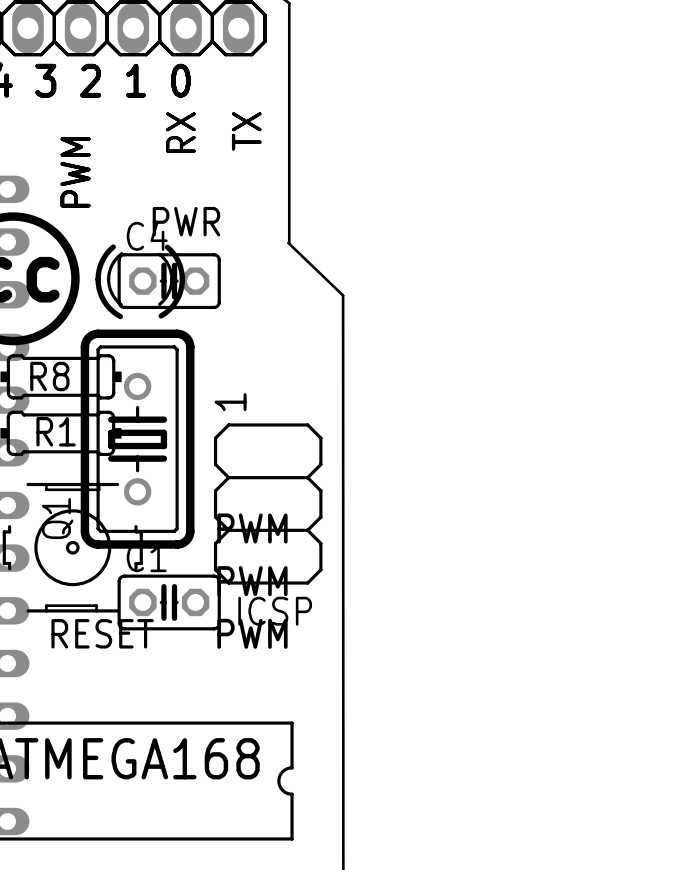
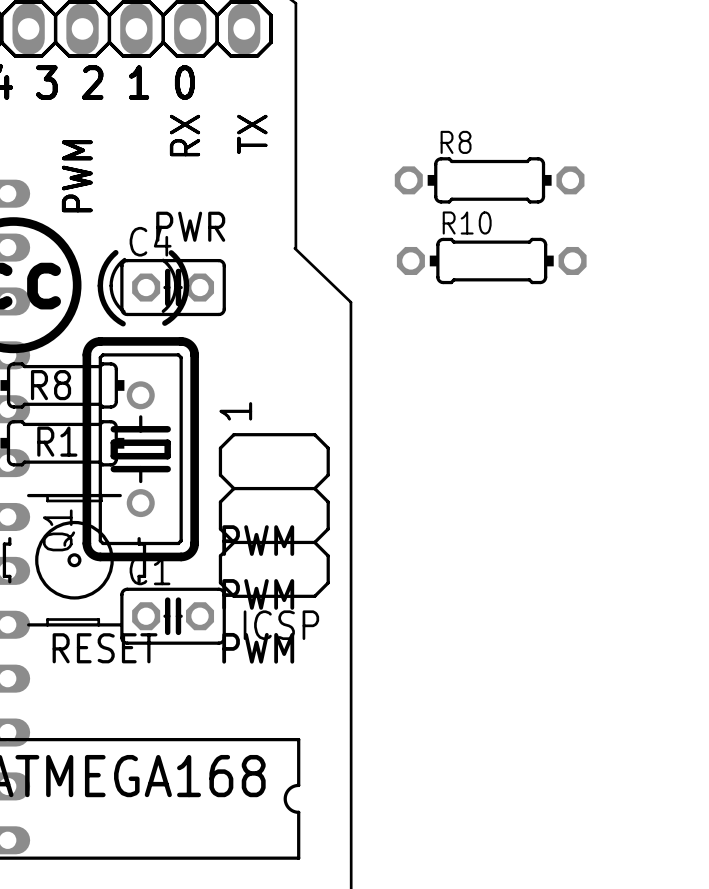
R8: none -> (489, 180)
R10: none -> (491, 260)

